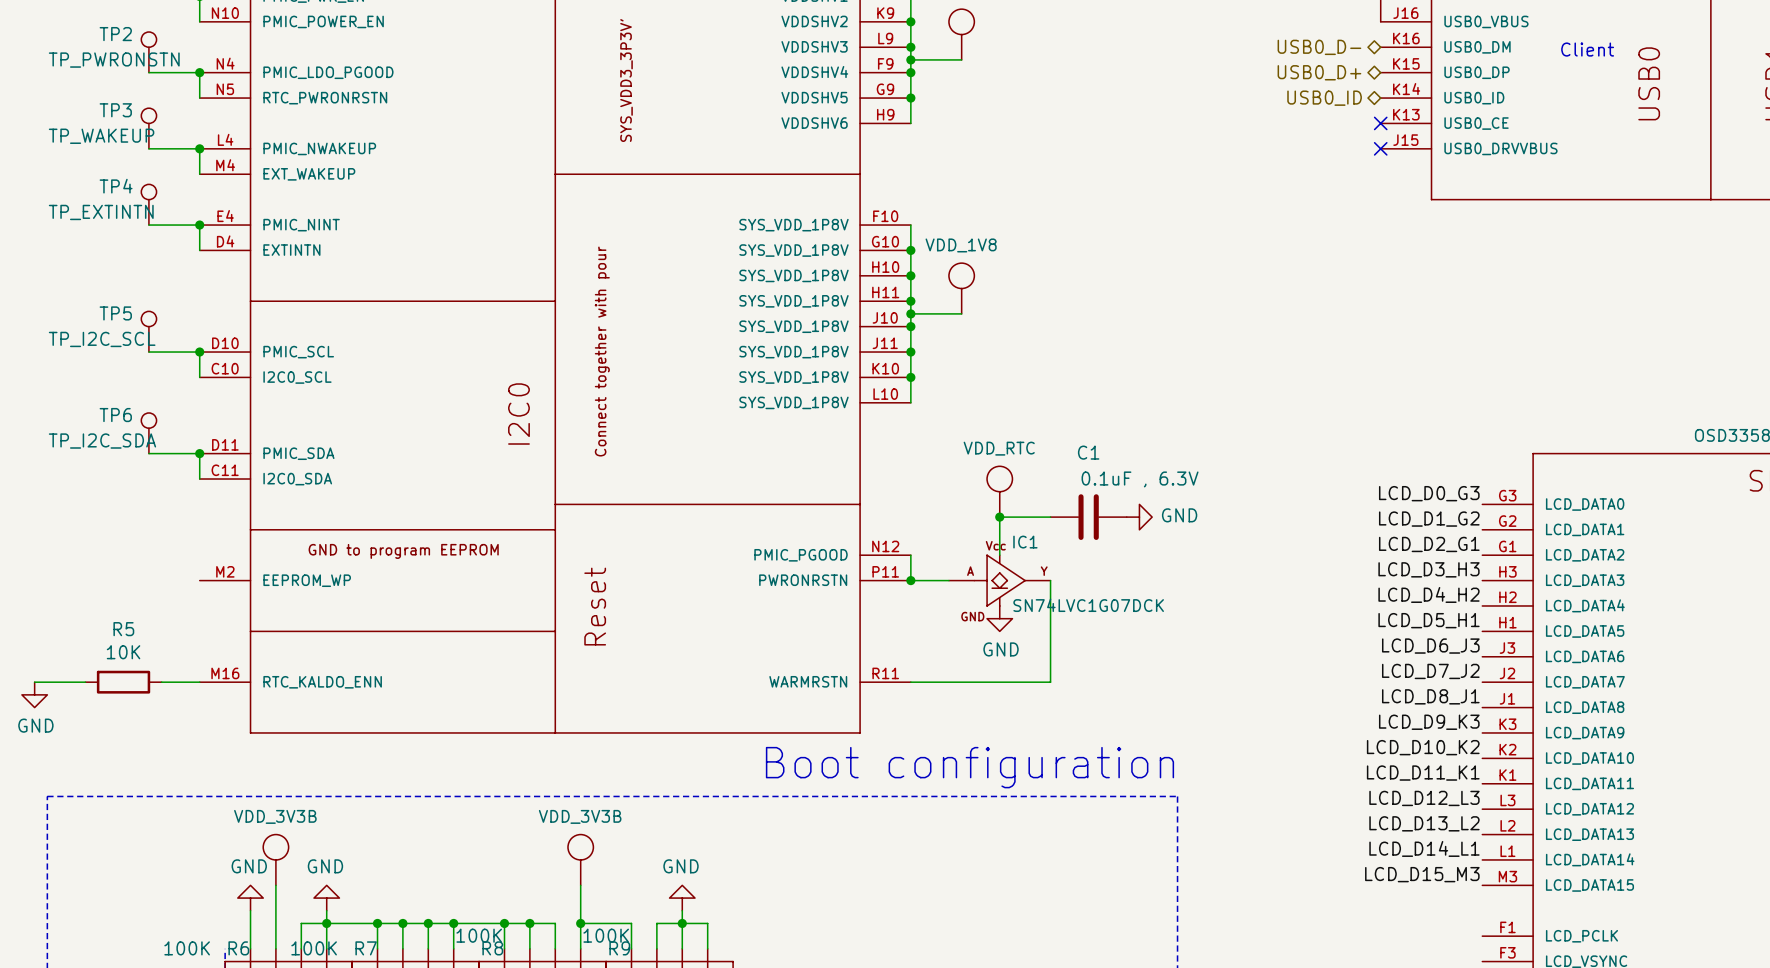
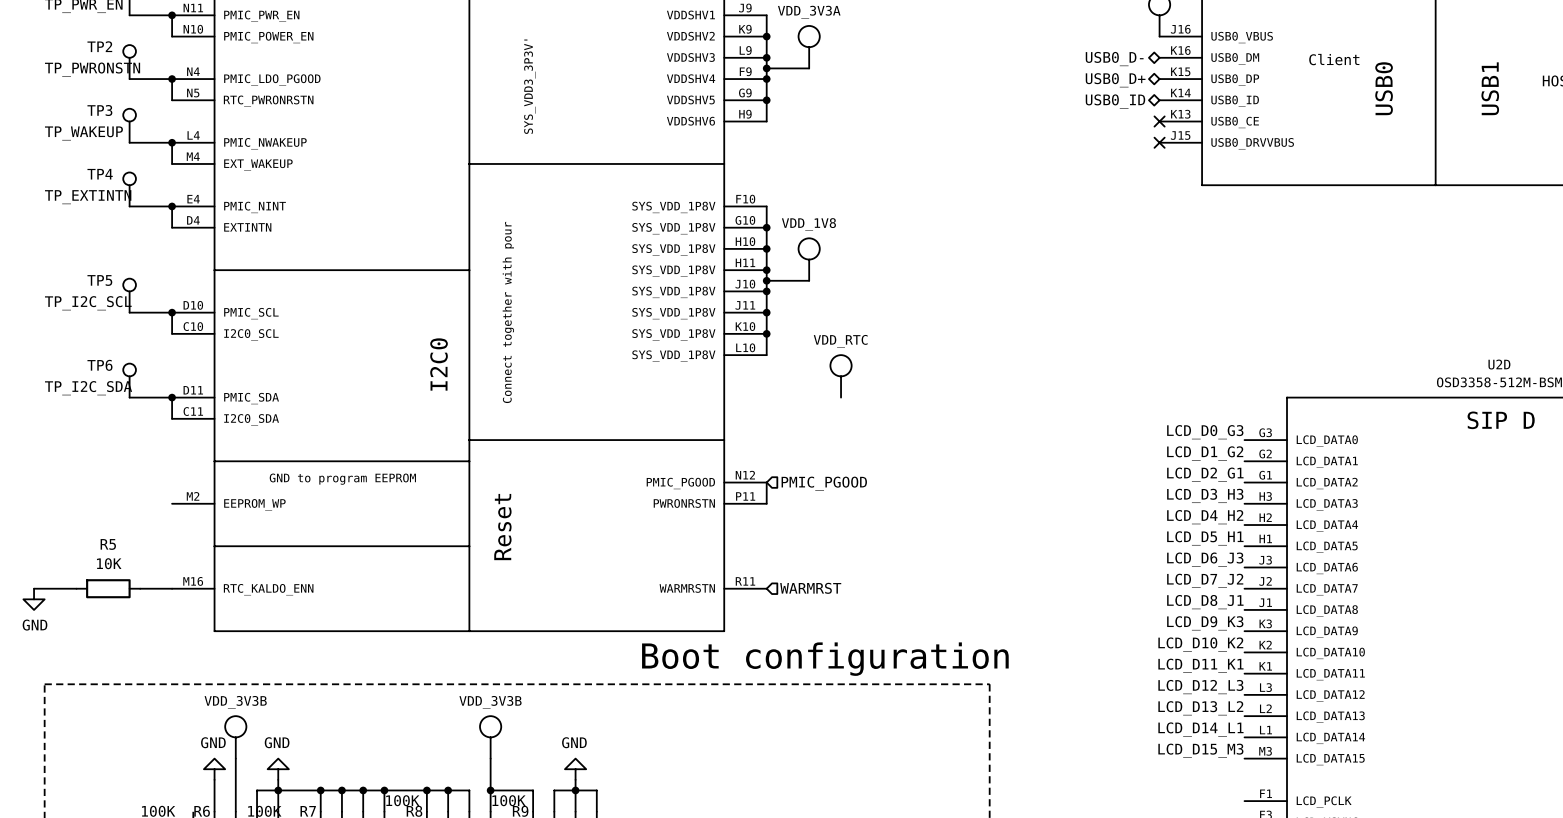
power symbol position: VDD_RTC (999, 491) -> VDD_RTC (841, 376)
junction: (999, 517) -> none
wire: (1050, 517) (999, 517) (999, 555) -> none
C1: 0.1uF , 6.3V (1088, 517) -> none
power symbol: GND (1139, 517) -> none
hierarchical label: none -> PMIC_PGOOD (824, 483)
wire: (910, 580) (948, 580) -> none
junction: (910, 580) -> none
IC1: SN74LVC1G07DCK (999, 580) -> none
wire: (1050, 580) (1050, 682) (910, 682) -> none
power symbol: GND (999, 618) -> none
hierarchical label: none -> WARMRST (810, 588)

